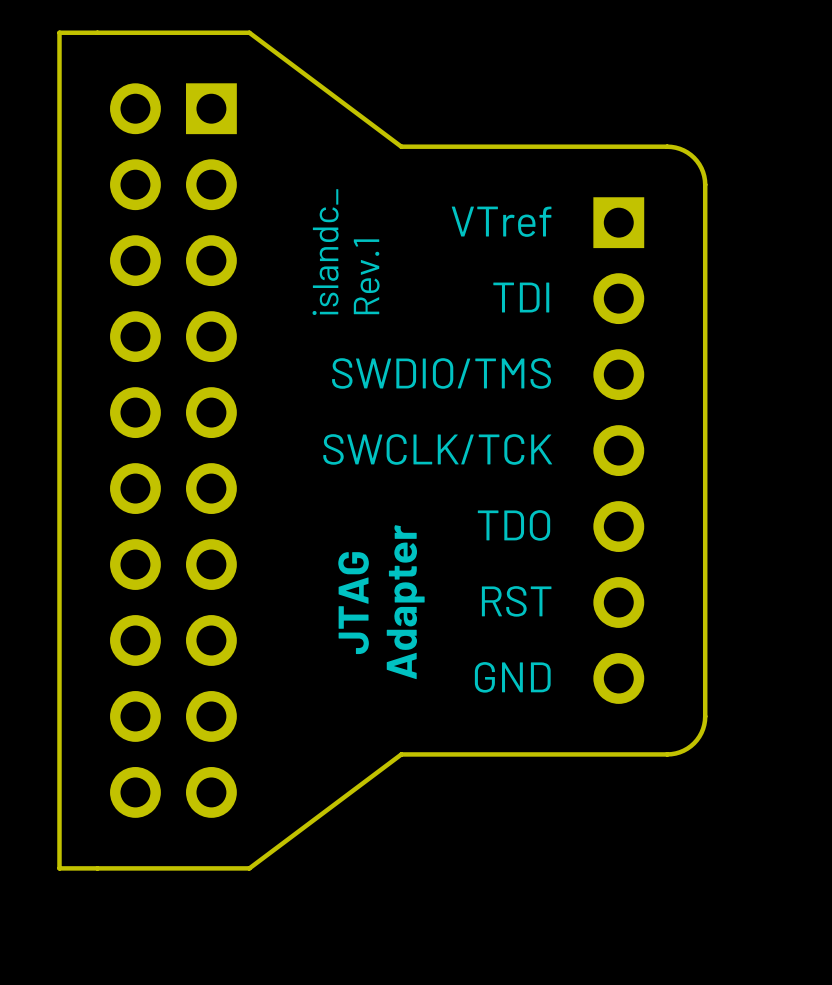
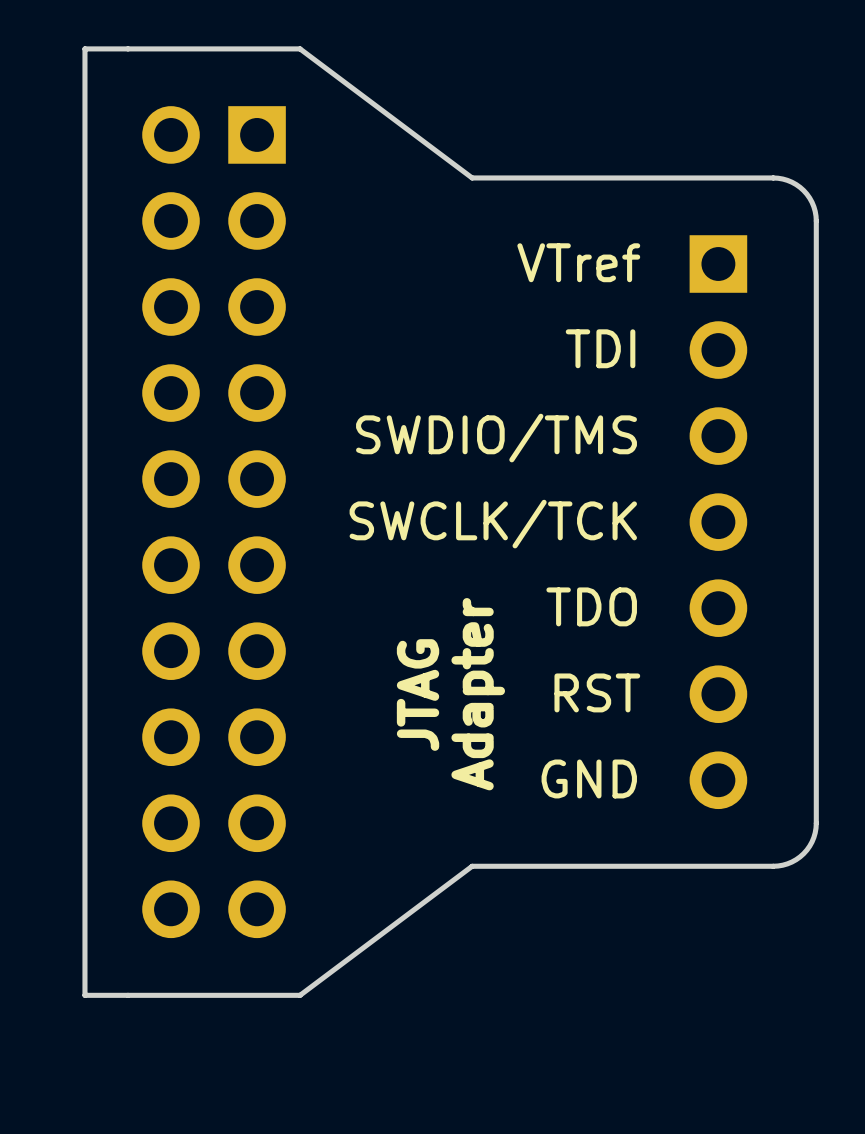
text: islandc_ (325, 252) -> none
text: Rev.1 (366, 276) -> none

